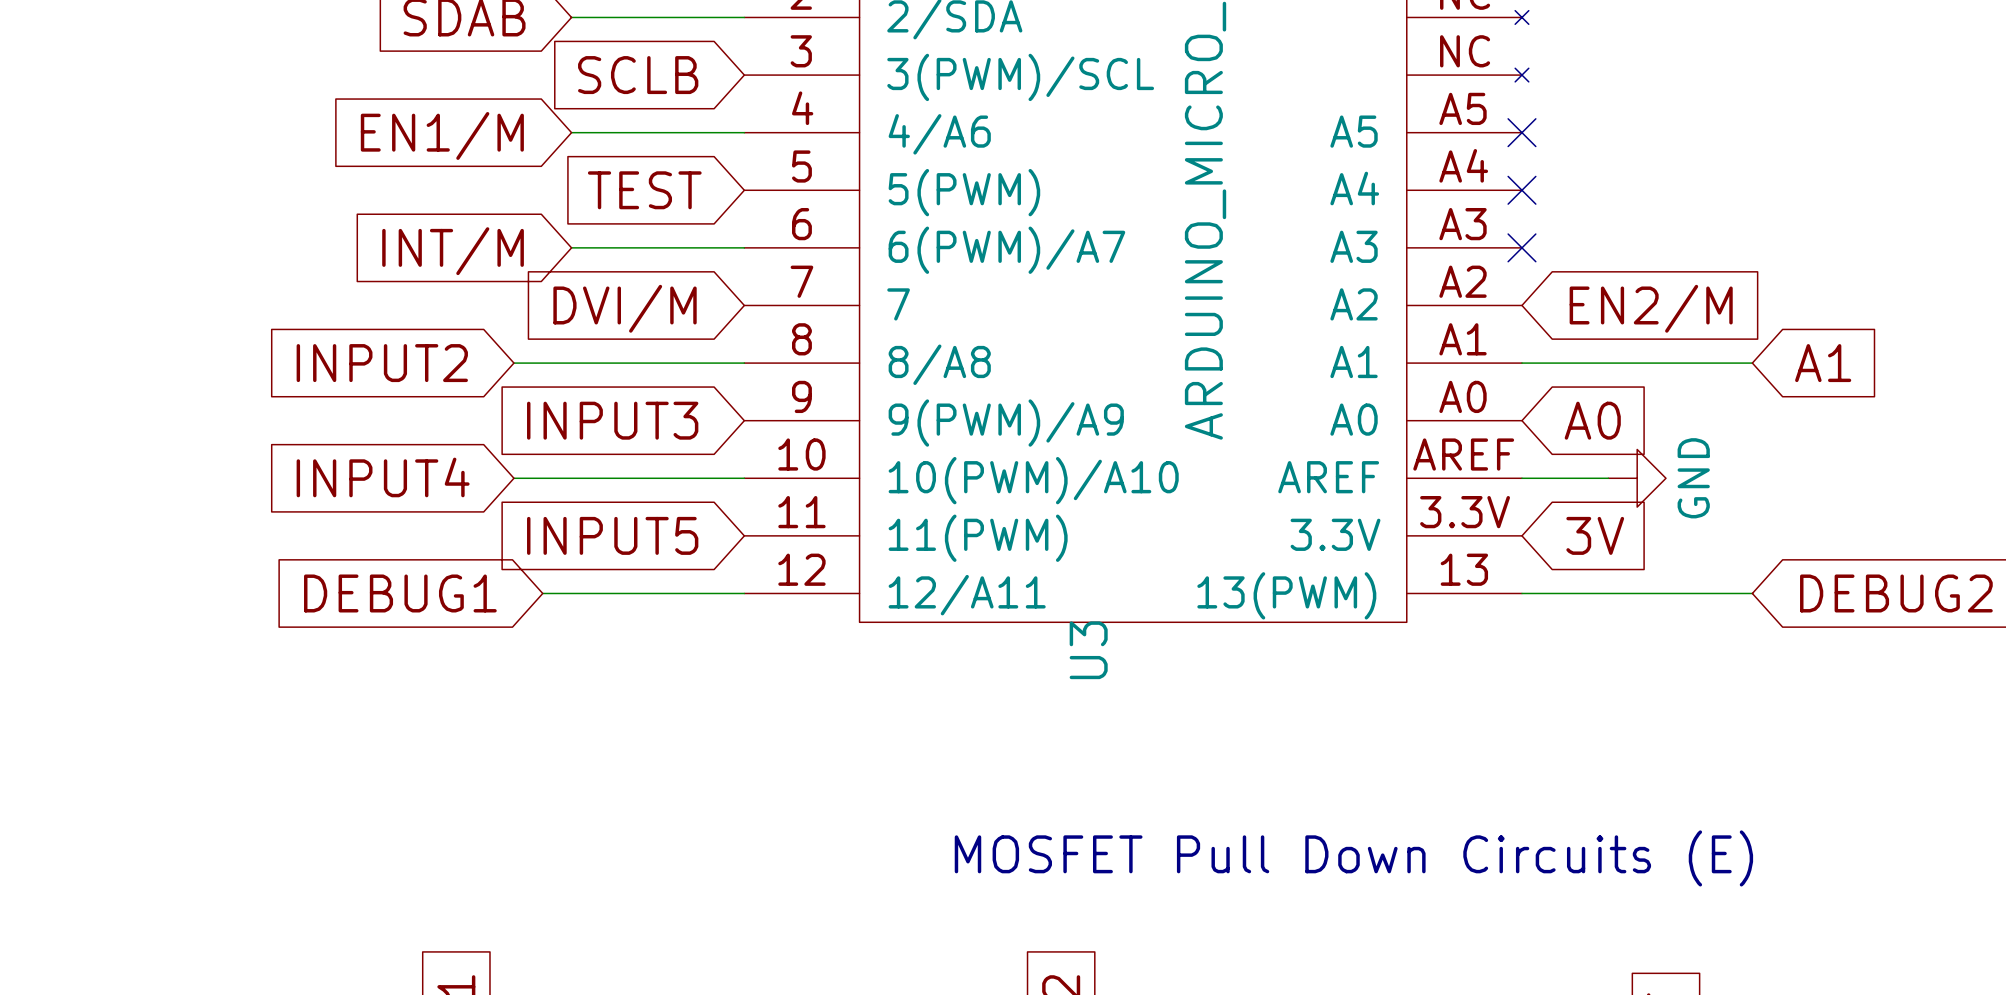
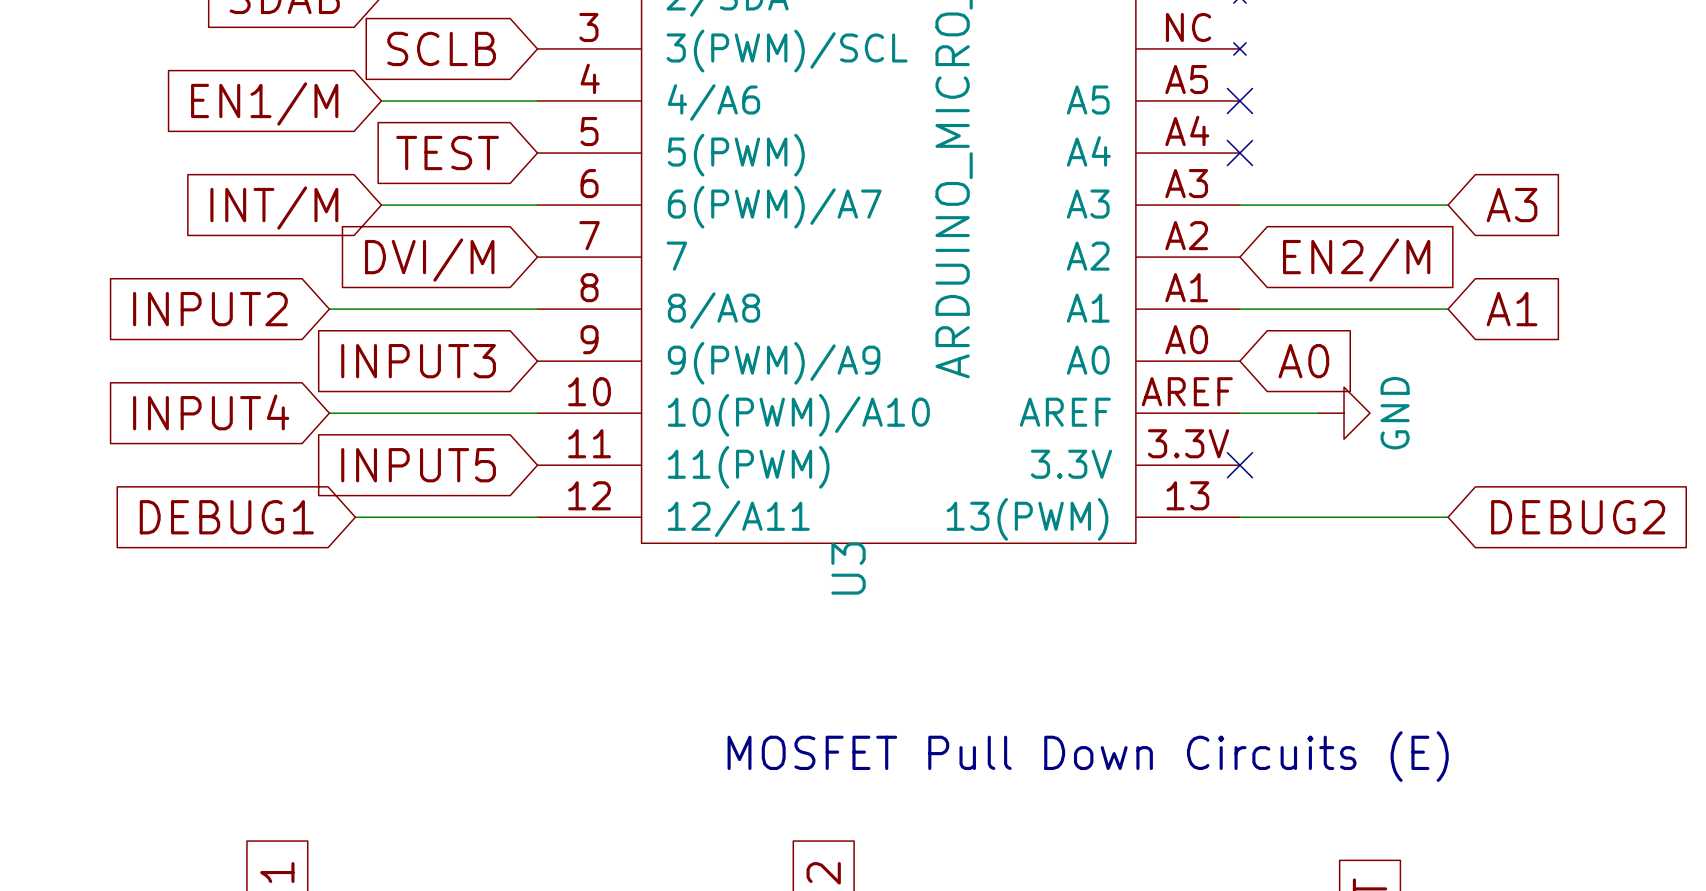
wire: none -> (1239, 205) (1448, 205)
no-connect mark: (1521, 247) -> none
global label: none -> A3 (1512, 205)
no-connect mark: none -> (1239, 465)
global label: 3V (1595, 535) -> none

